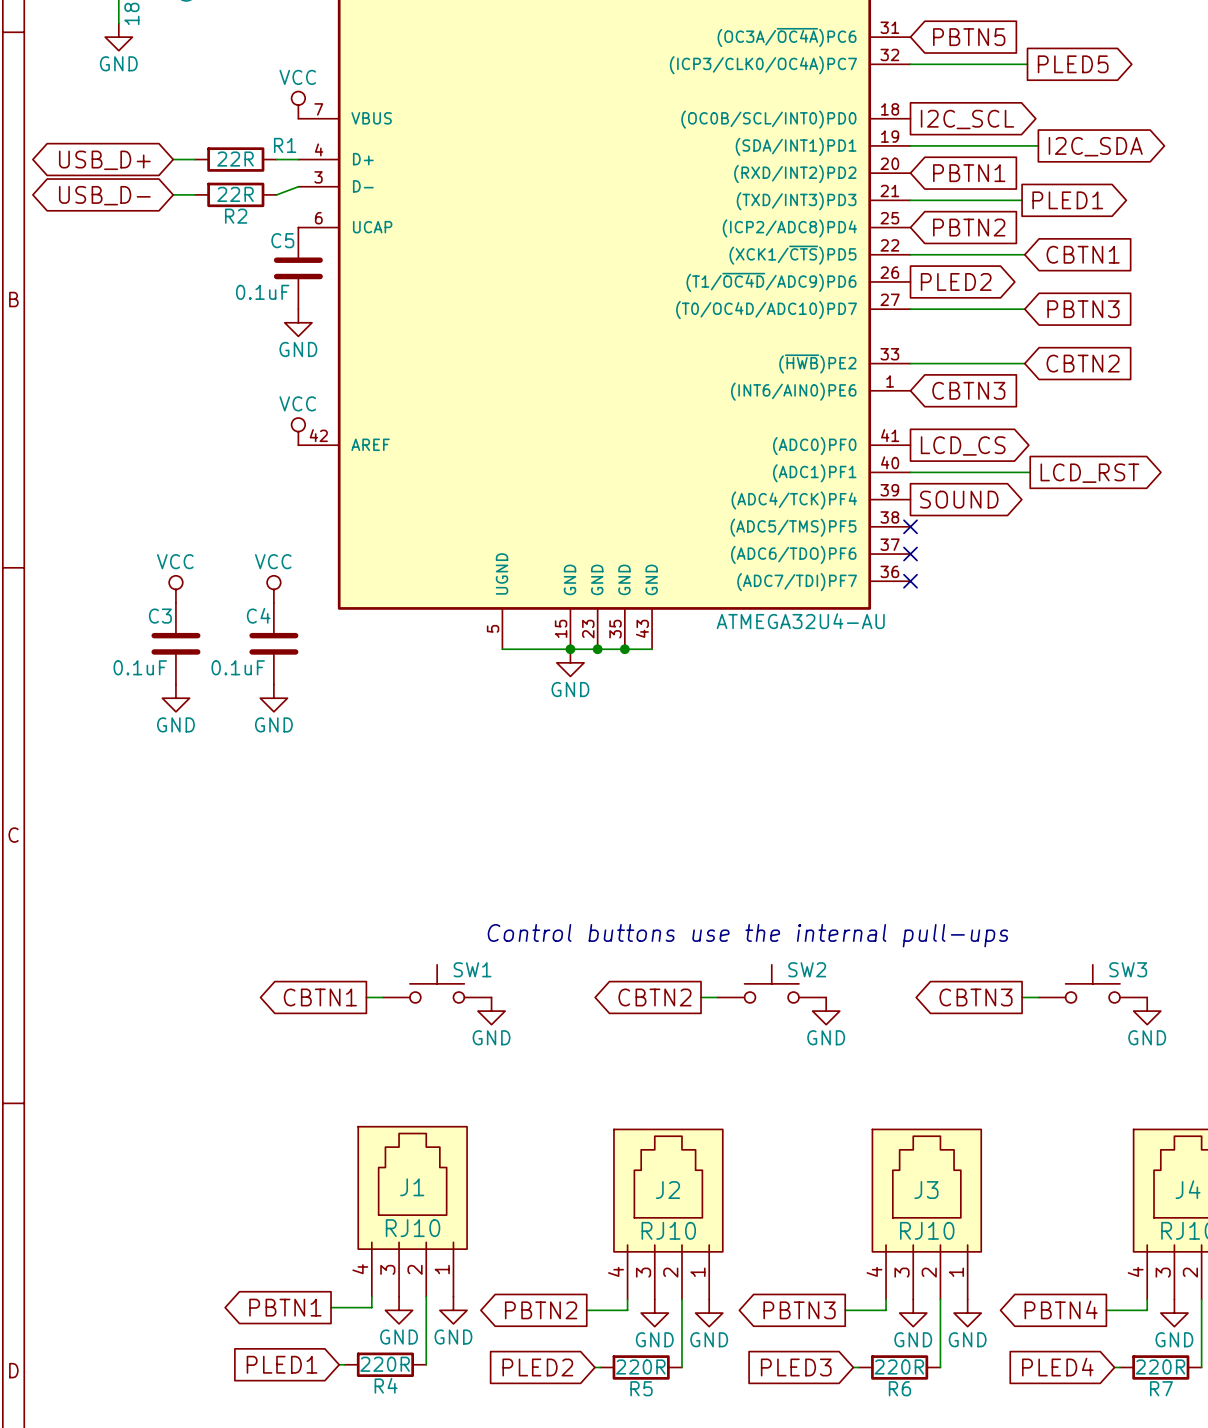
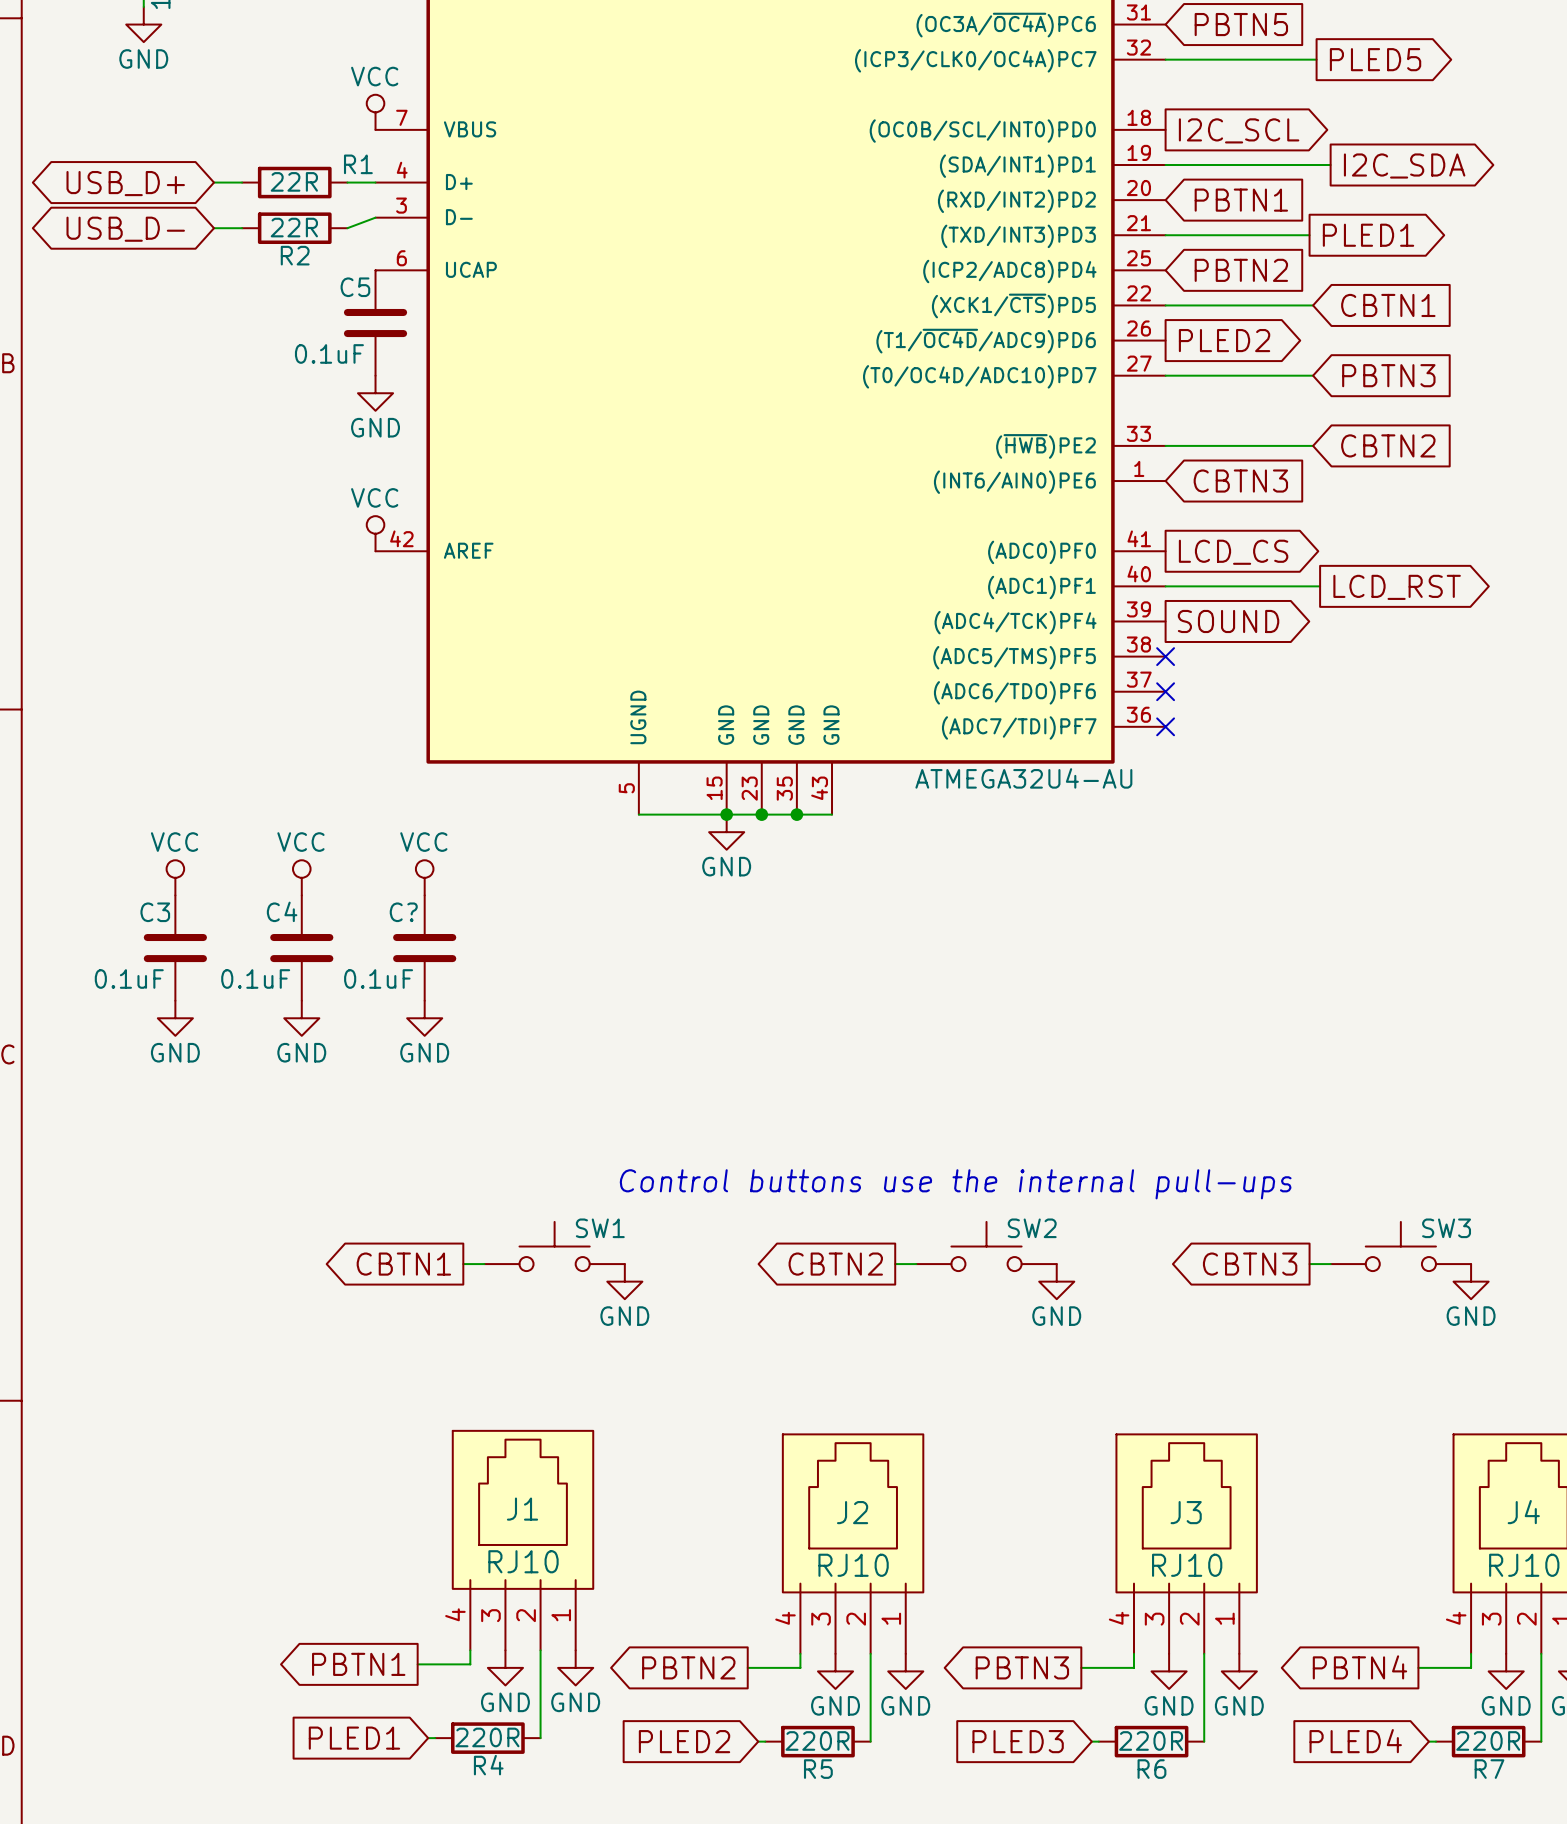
power symbol: VCC (175, 589) -> none
power symbol: VCC (273, 589) -> none
C3 position: (175, 643) -> (175, 948)
C4 position: (273, 643) -> (301, 948)
power symbol: none -> VCC (175, 877)
power symbol: GND (175, 698) -> none
power symbol: none -> VCC (301, 877)
power symbol: GND (273, 698) -> none
power symbol: none -> VCC (424, 877)
C?: none -> 0.1uF (424, 948)
power symbol: none -> GND (175, 1018)
power symbol: none -> GND (301, 1018)
power symbol: none -> GND (424, 1018)

